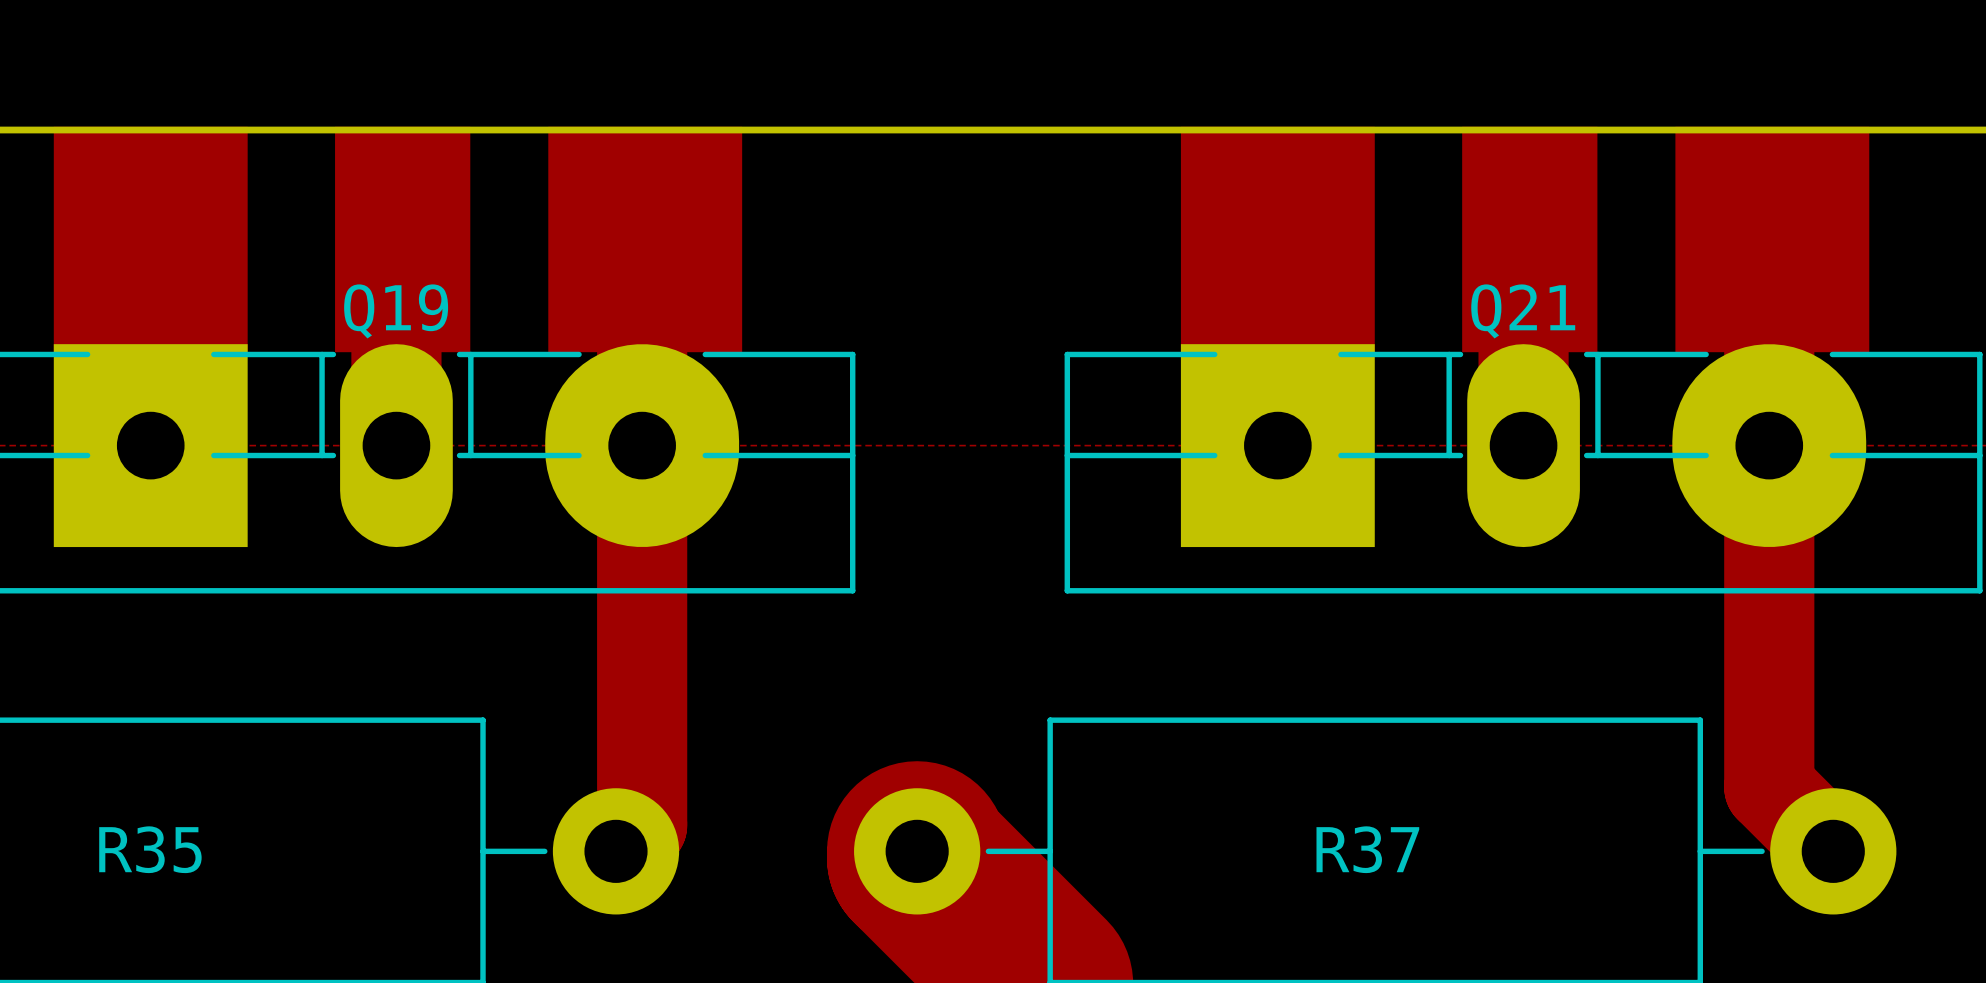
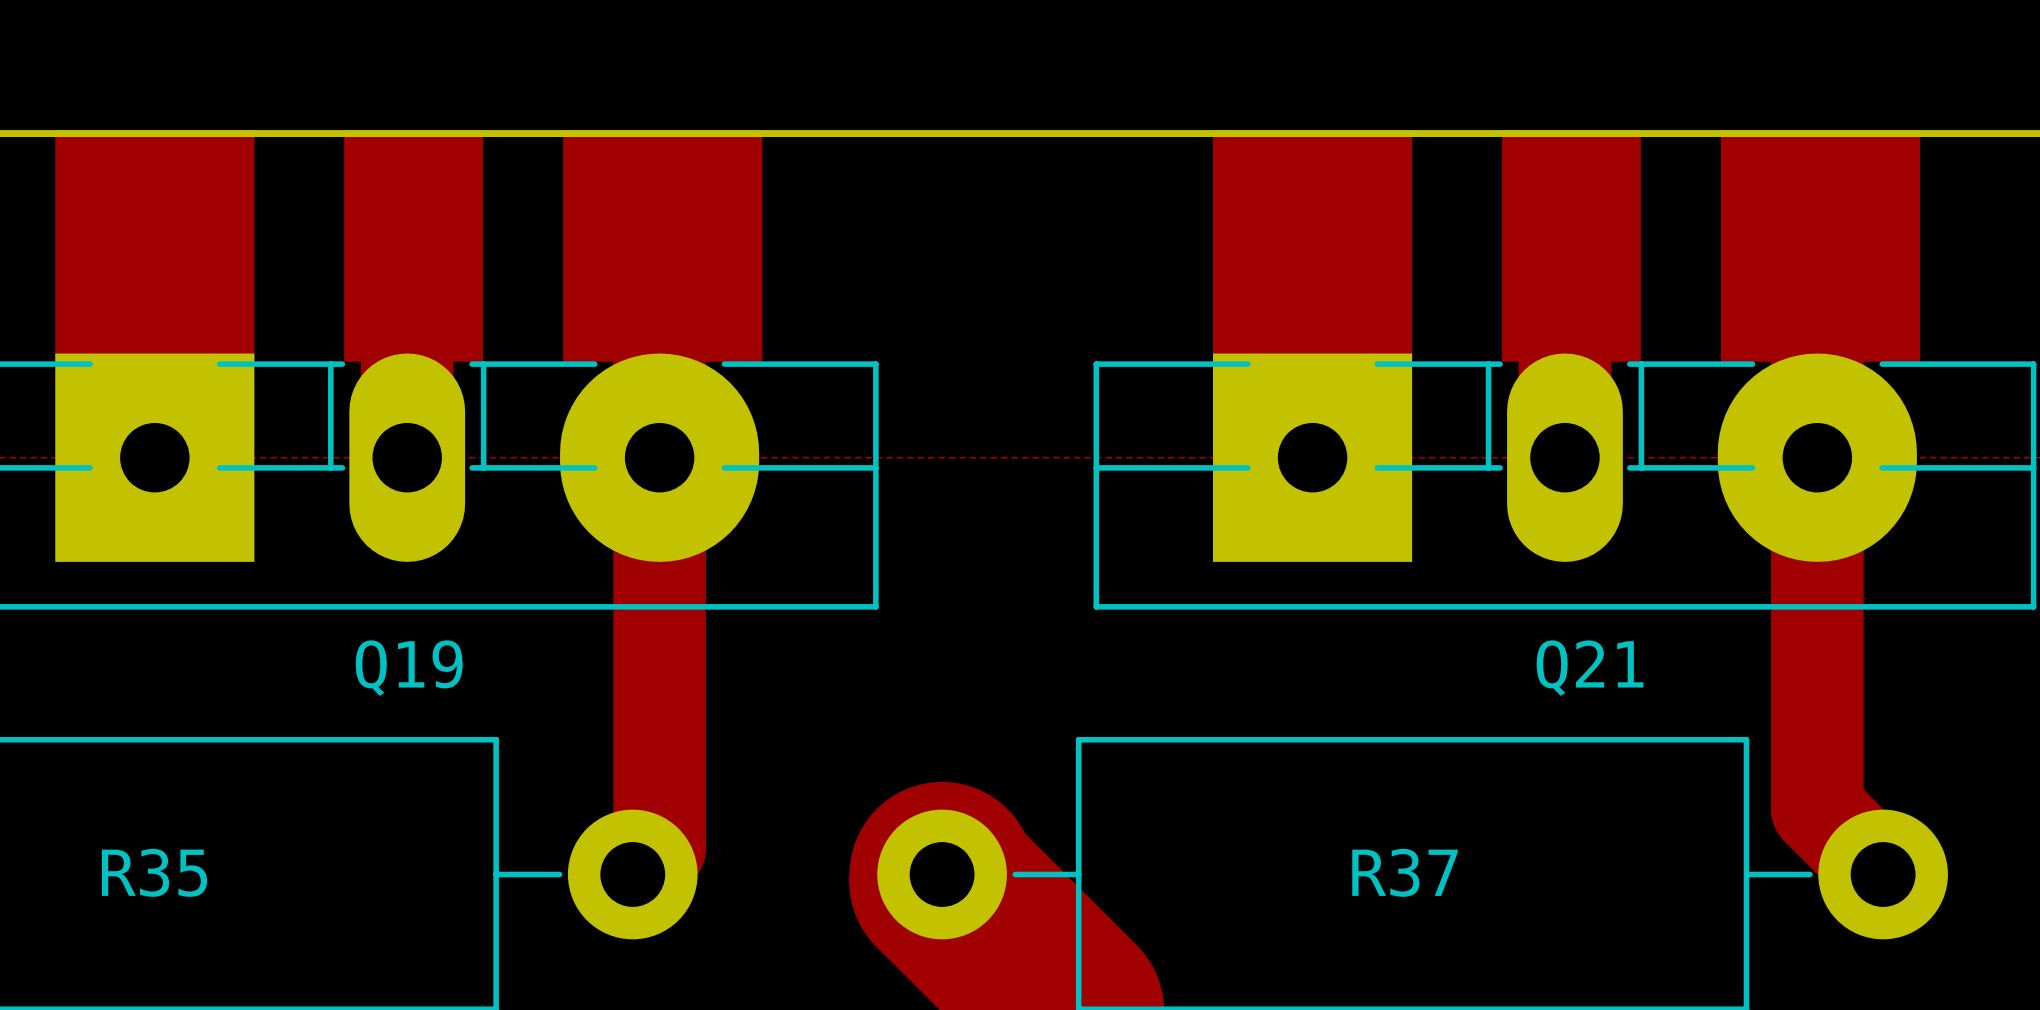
Q19 name position: Q19 (396, 311) -> Q19 (409, 668)
Q21 name position: Q21 (1523, 311) -> Q21 (1590, 668)

